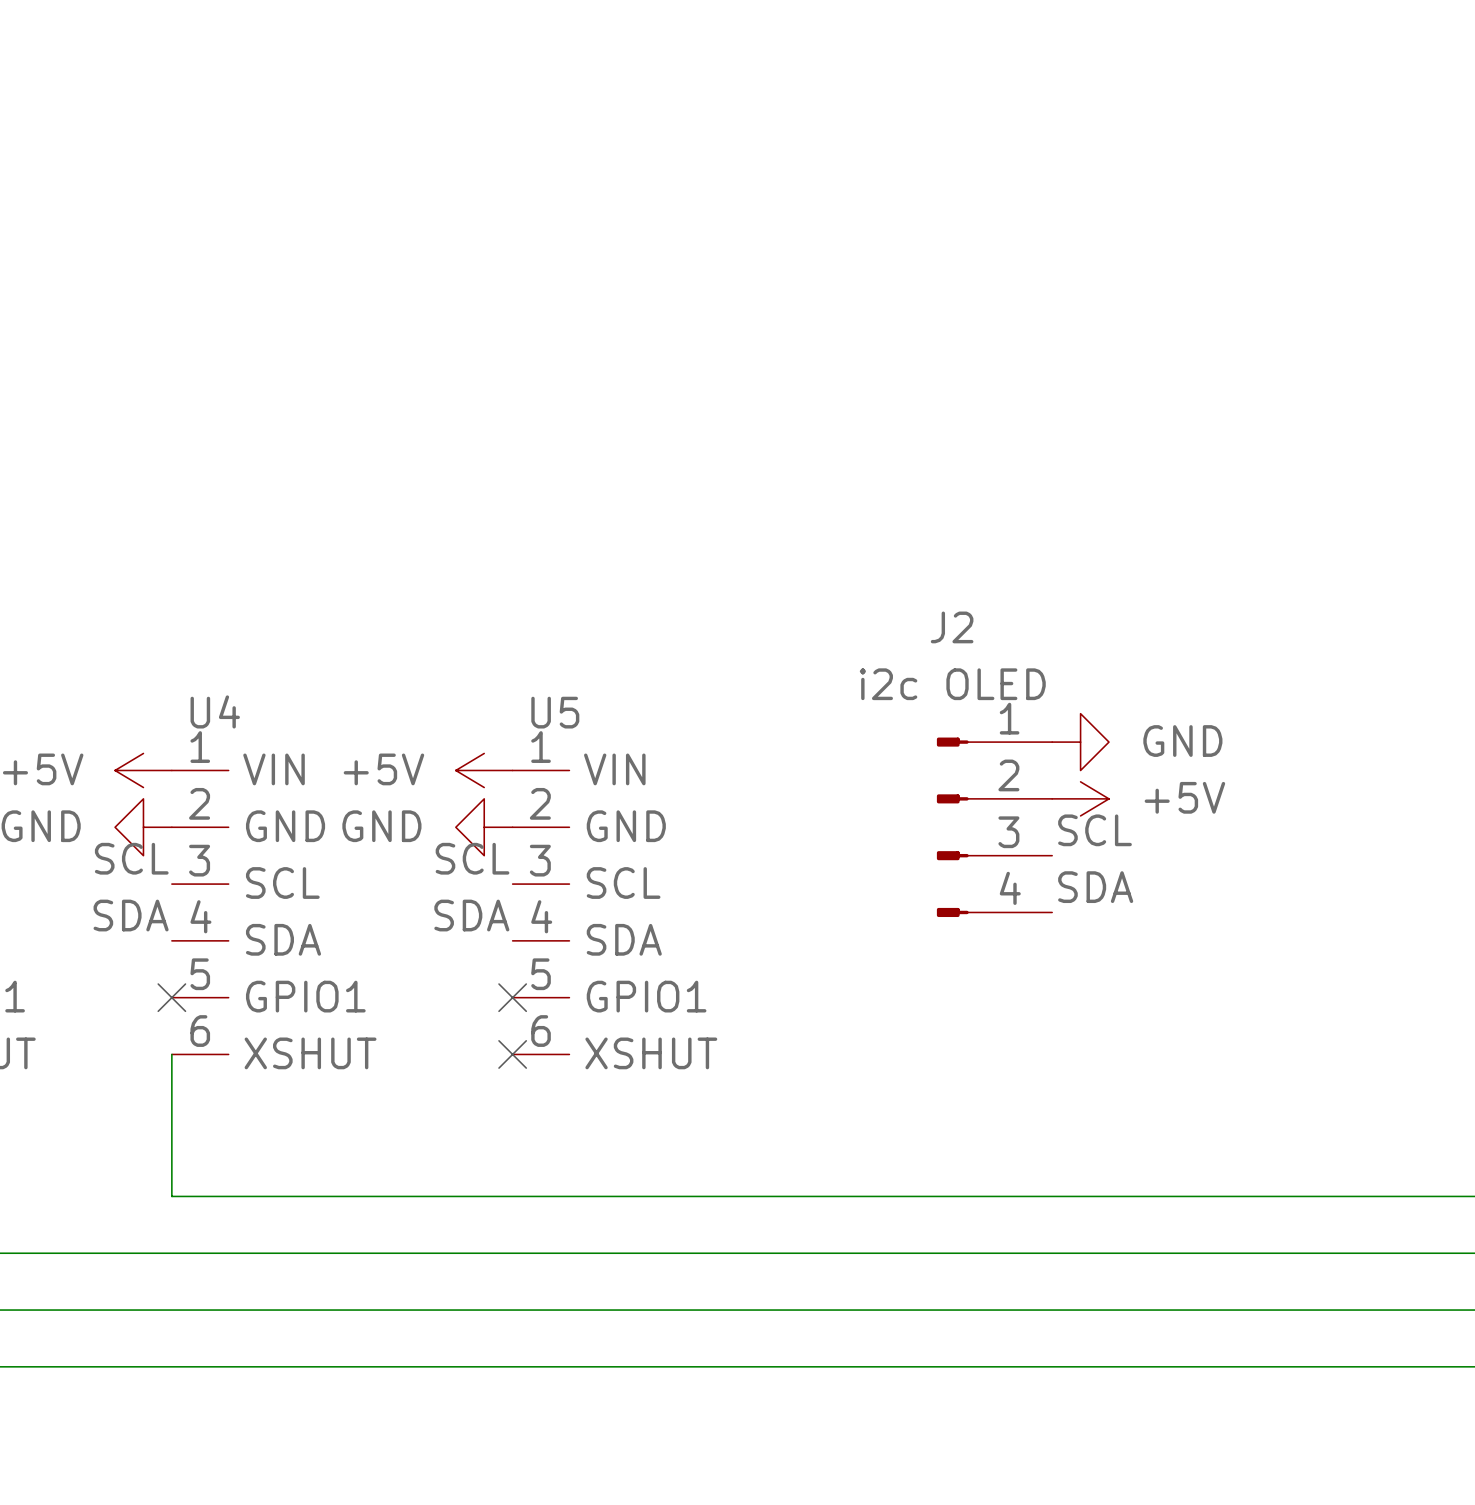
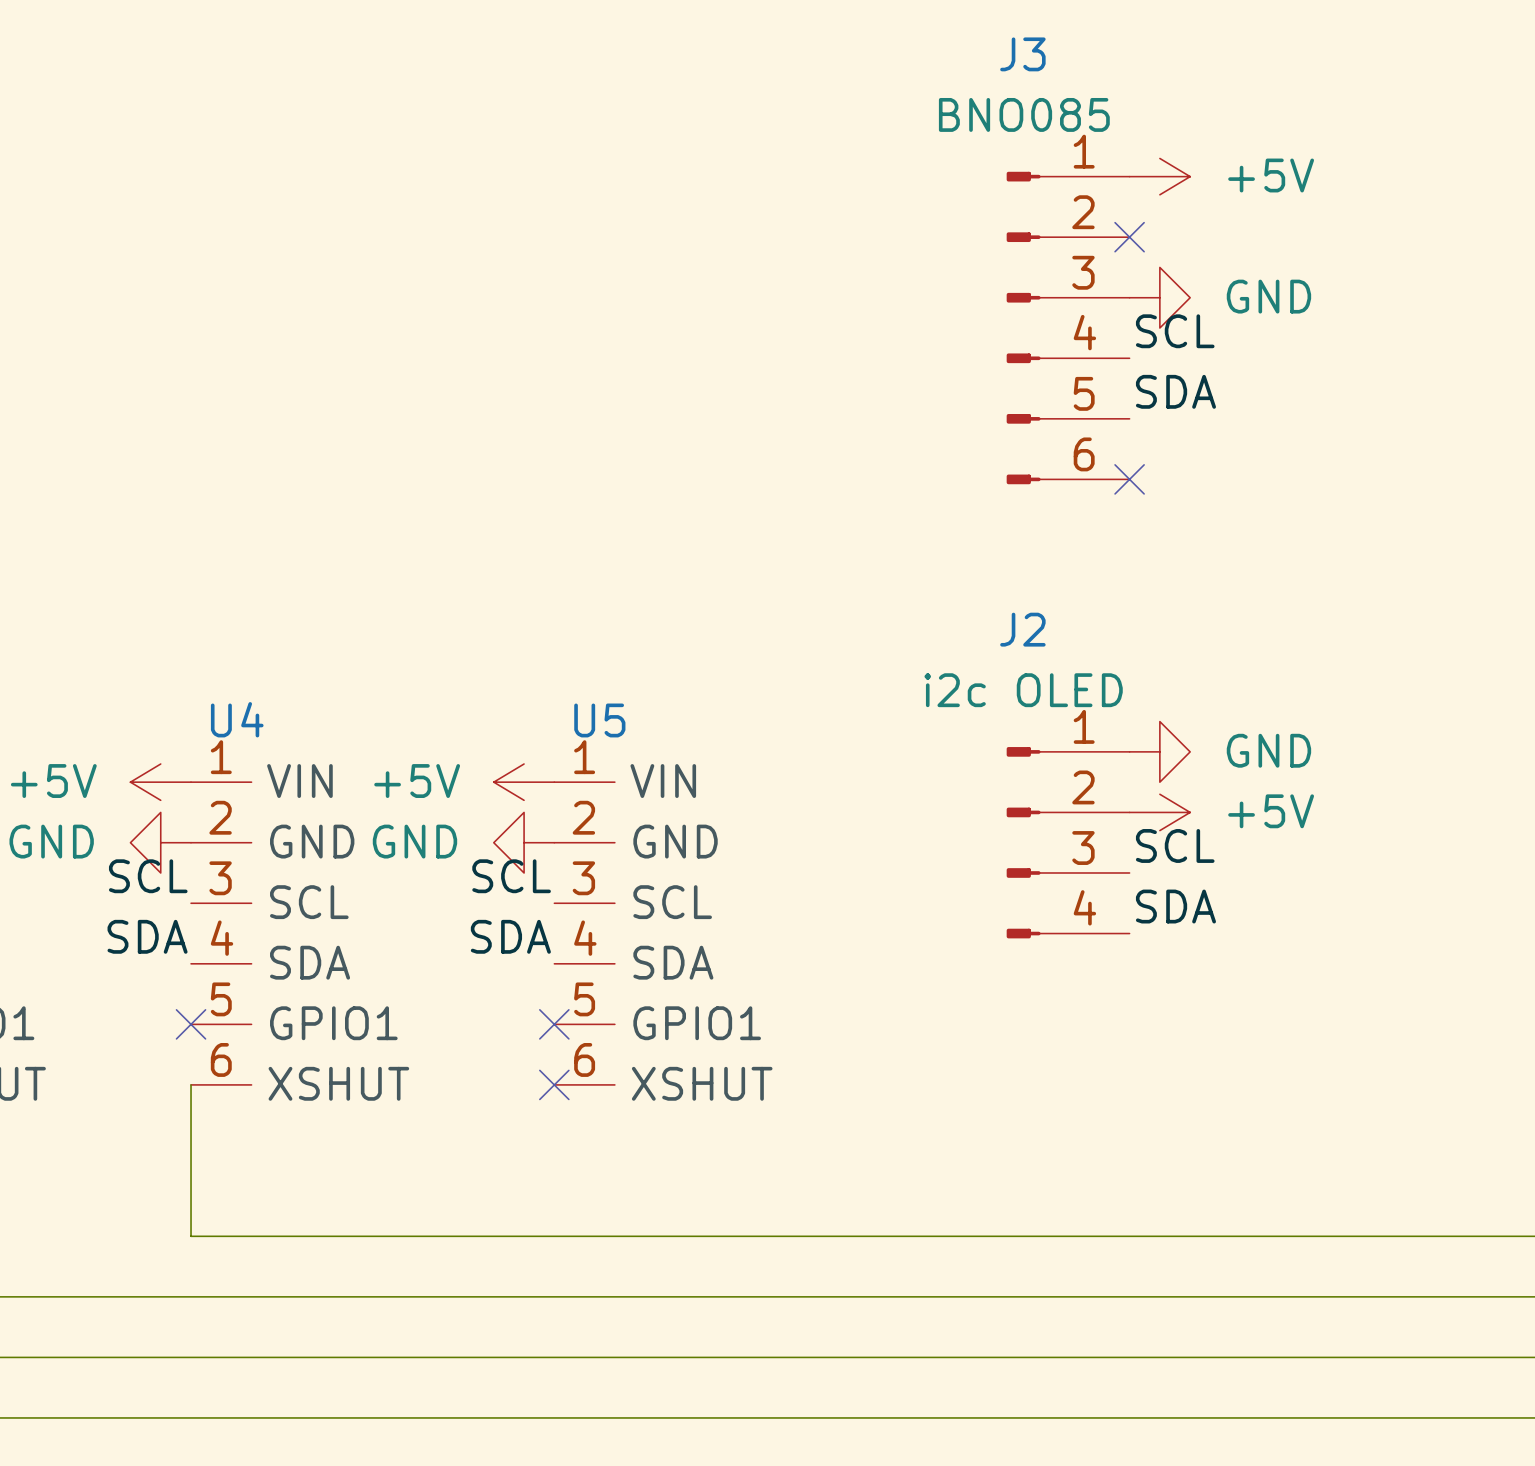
power symbol: none -> +5V (1159, 176)
no-connect mark: none -> (1129, 237)
power symbol: none -> GND (1159, 297)
J3: none -> BNO085 (1068, 328)
label: none -> SCL (1175, 331)
label: none -> SDA (1175, 391)
no-connect mark: none -> (1129, 479)

